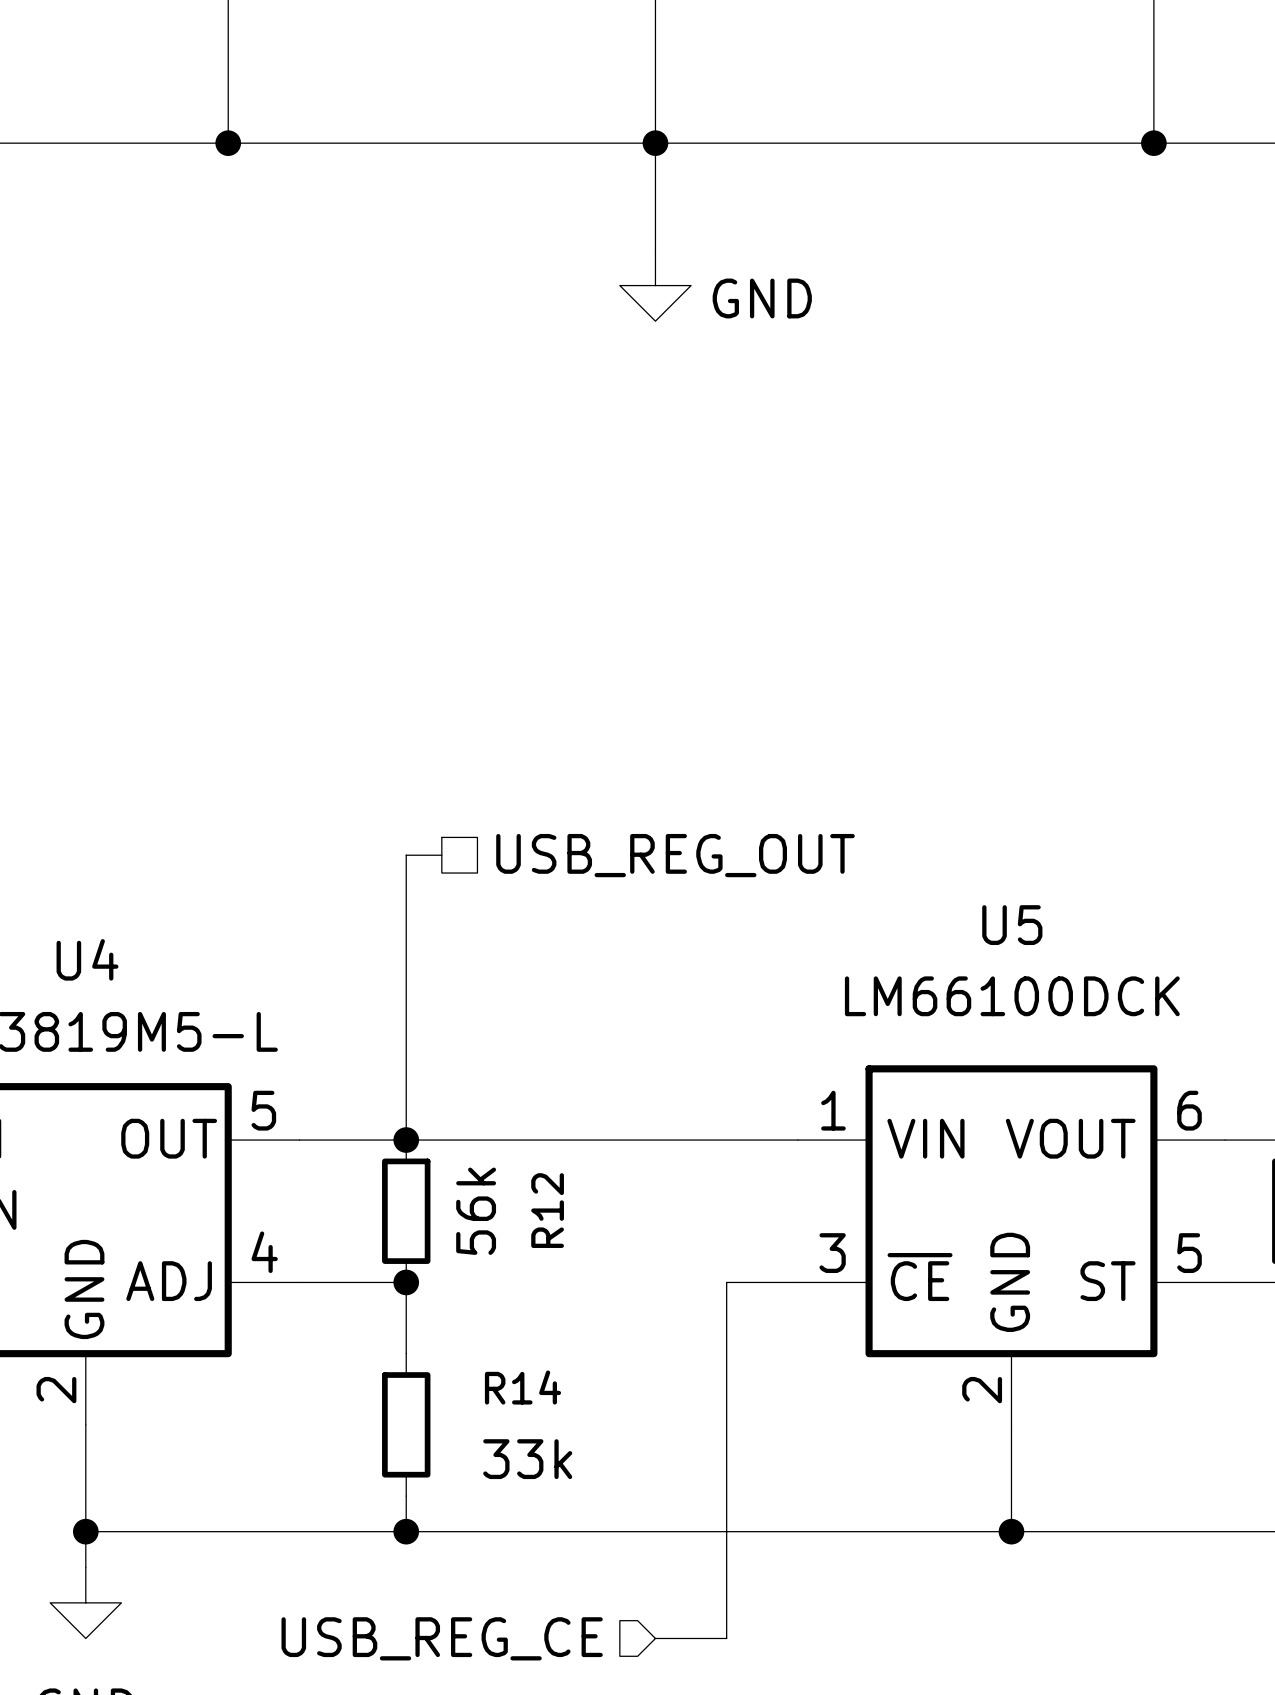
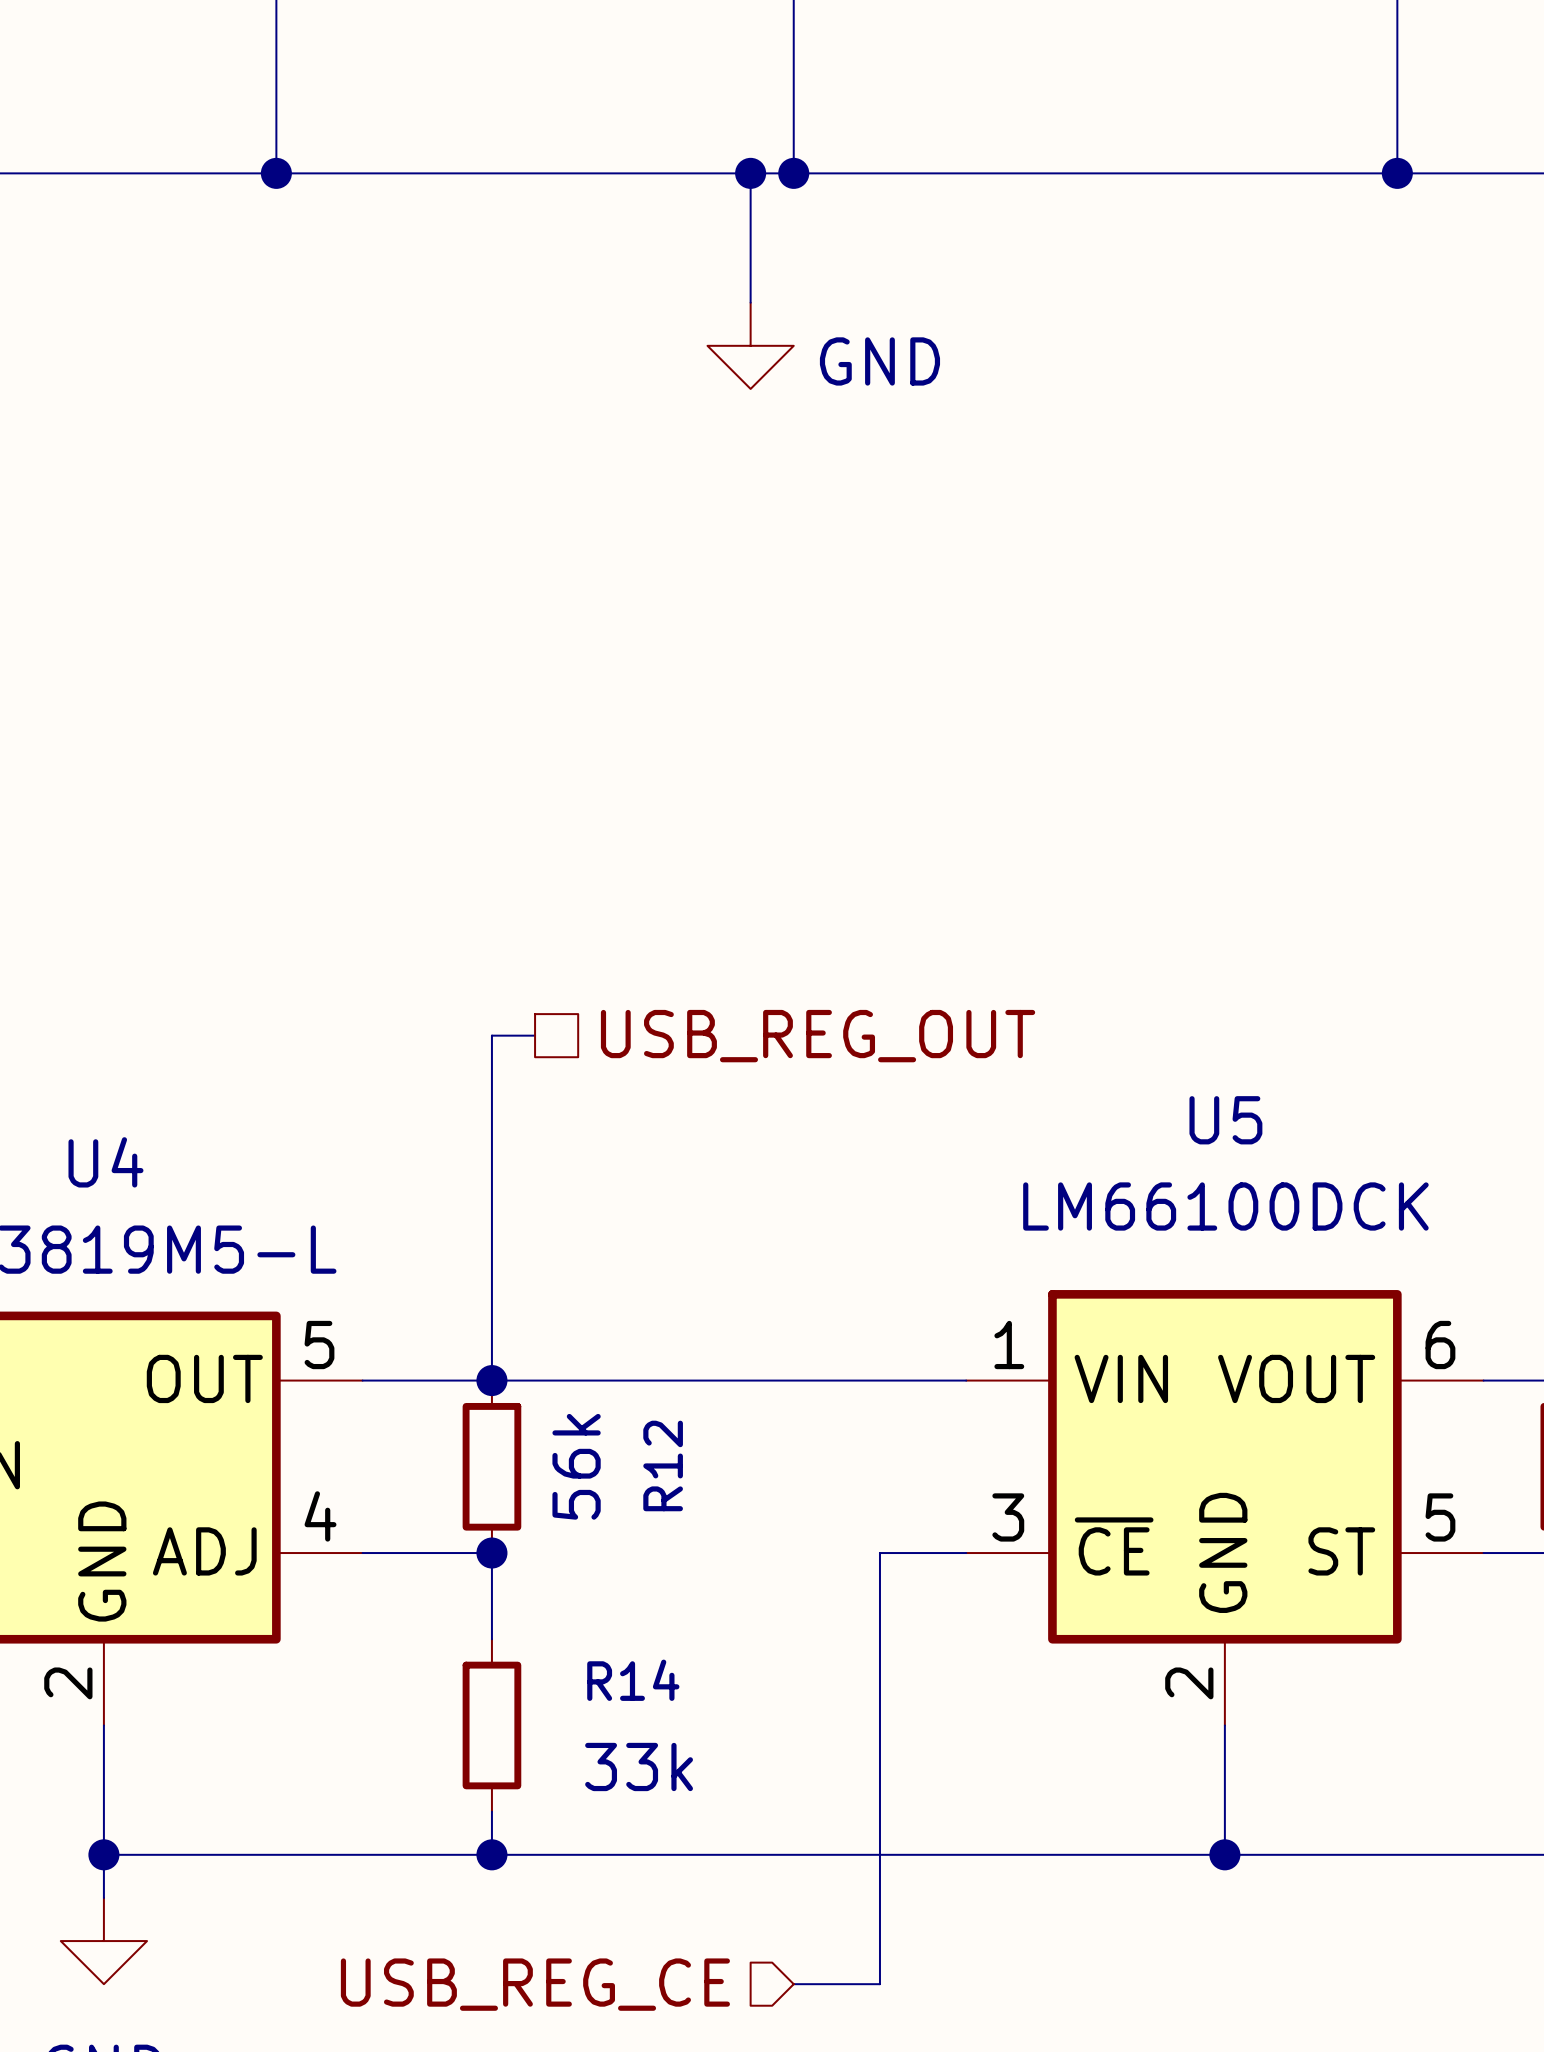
junction: none -> (750, 173)
wire: (655, 143) (655, 249) -> (750, 173) (750, 302)
power symbol position: GND (655, 285) -> GND (750, 345)

